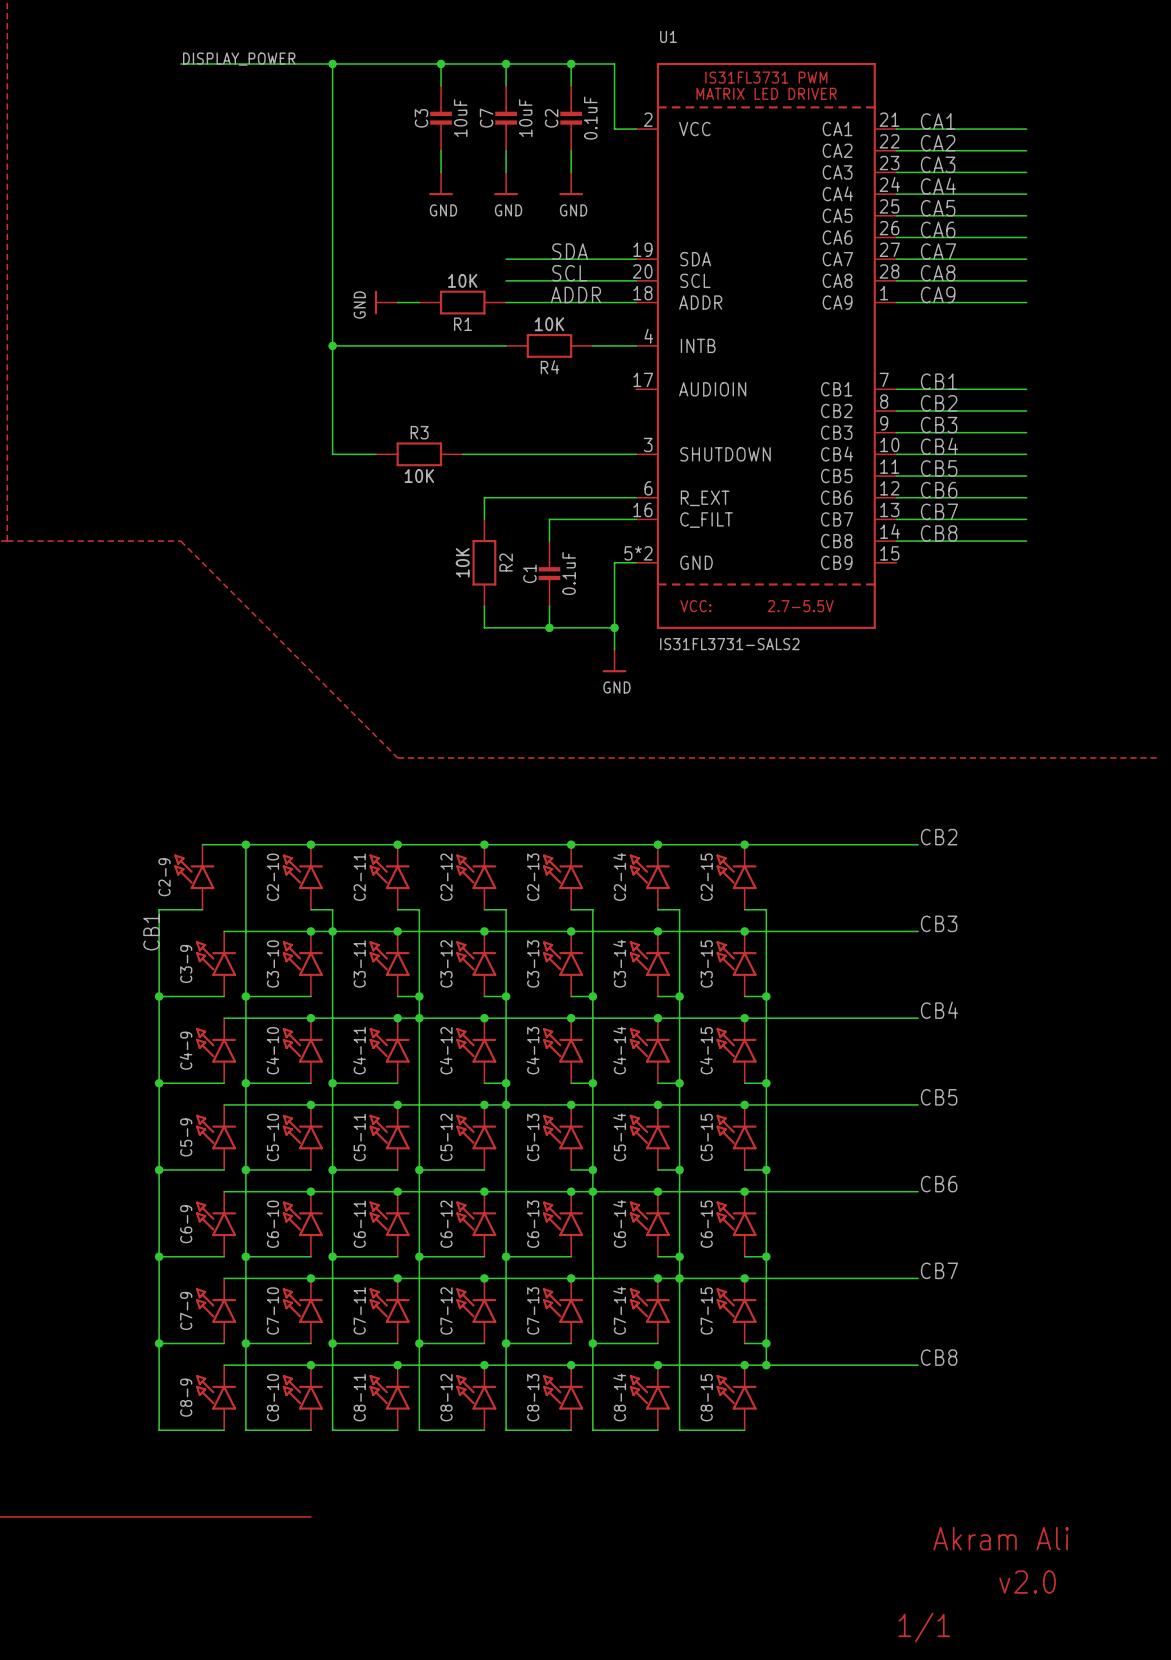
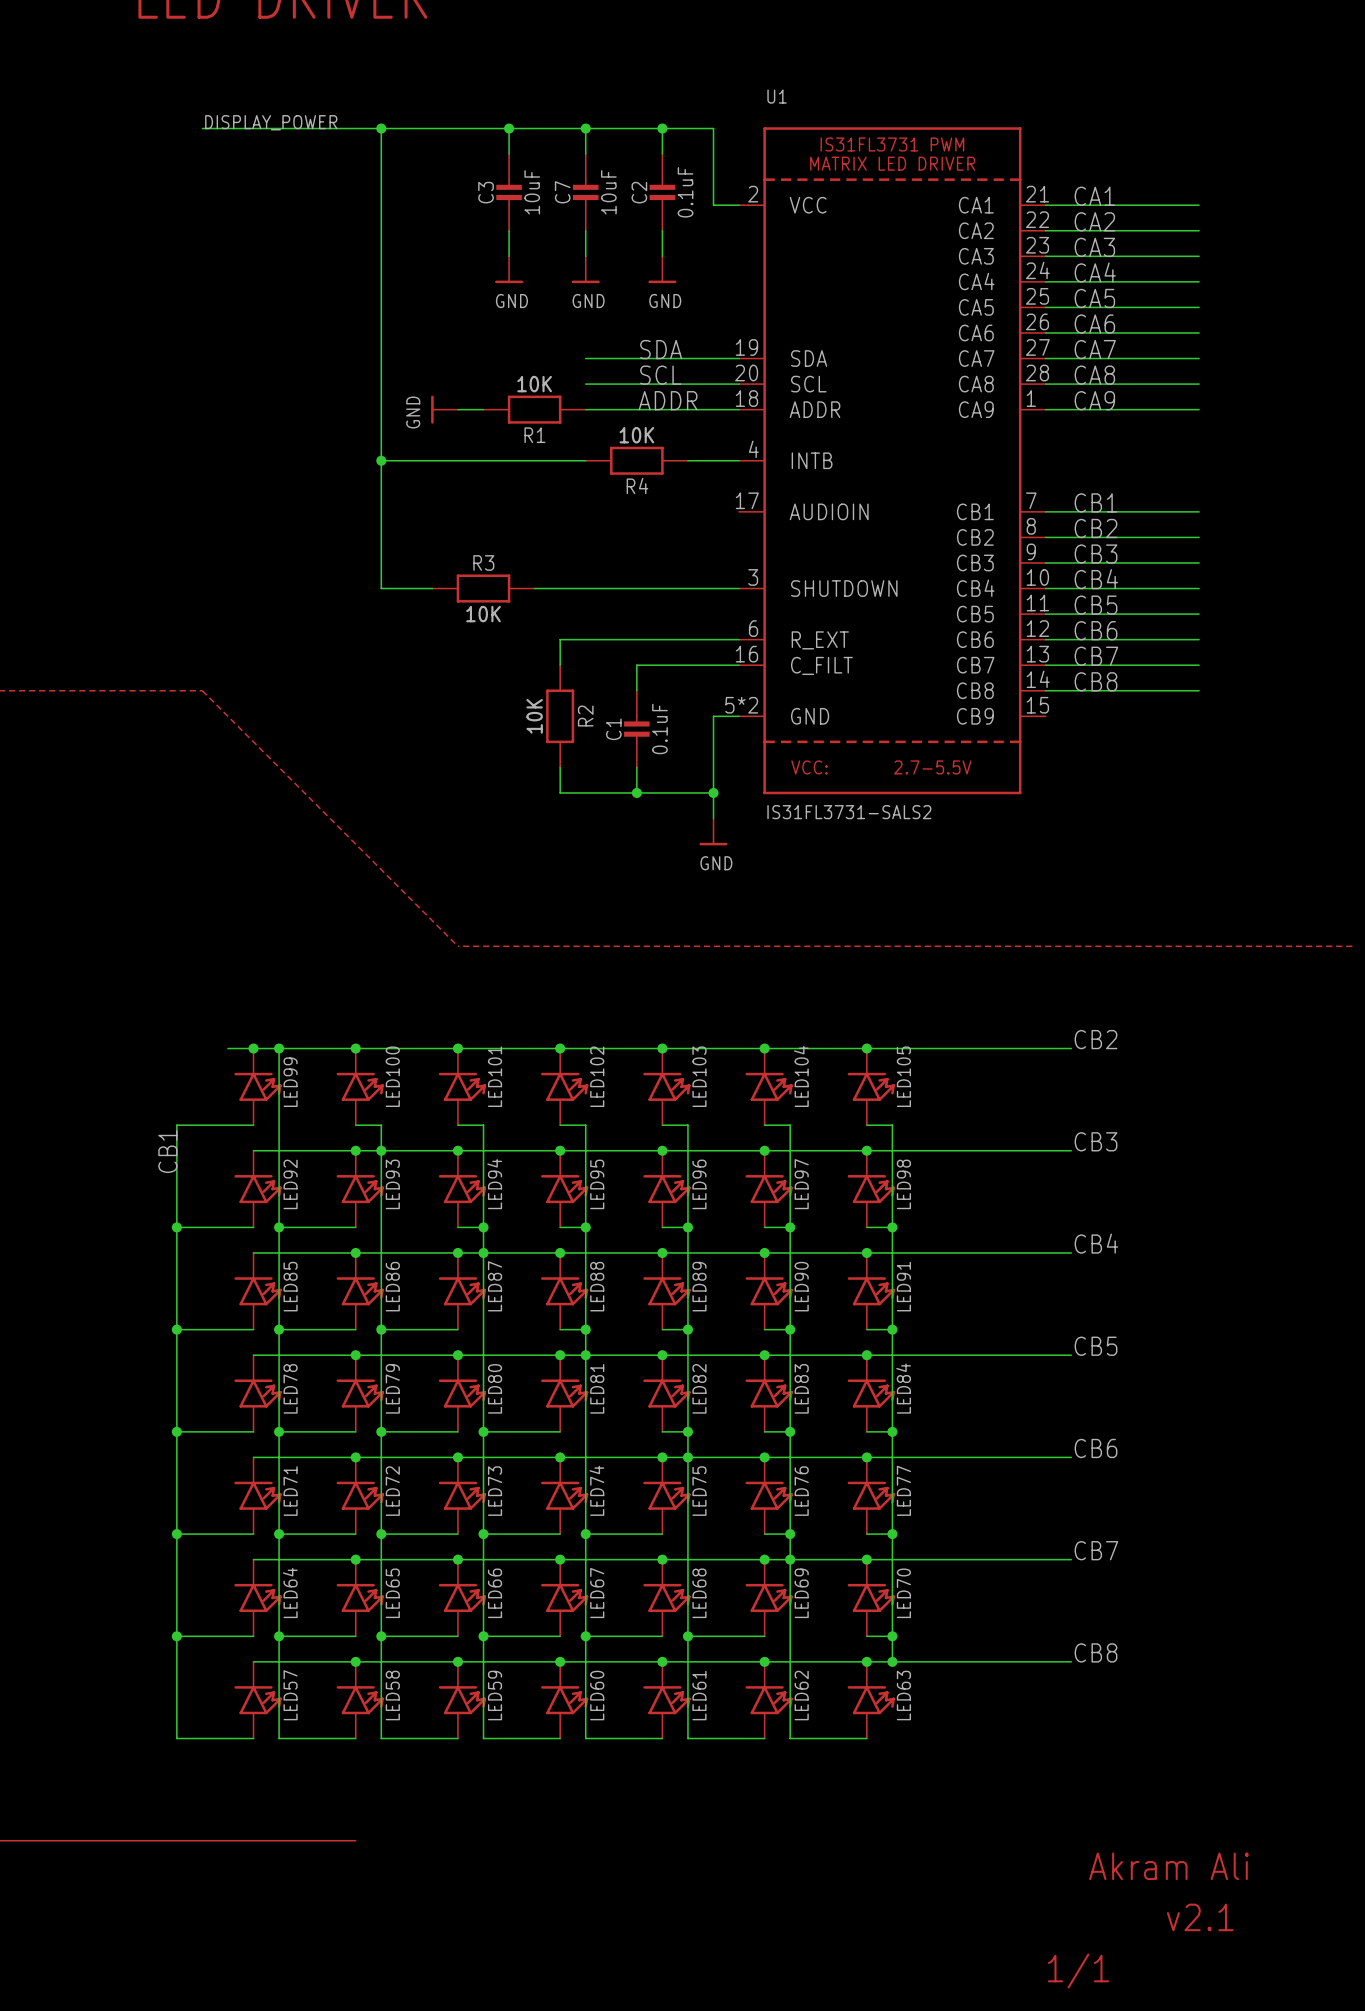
junction: none -> (253, 1048)
C2-9: (194, 877) -> none
LED99: none -> (257, 1086)
C2-10: (302, 877) -> none
LED100: none -> (360, 1086)
C2-11: (389, 877) -> none
LED101: none -> (462, 1086)
C2-12: (476, 877) -> none
LED102: none -> (564, 1086)
C2-13: (563, 877) -> none
LED103: none -> (666, 1086)
C2-14: (649, 877) -> none
LED104: none -> (769, 1086)
C2-15: (736, 877) -> none
LED105: none -> (871, 1086)
wire: none -> (227, 1125) (253, 1125)
C3-9: (216, 963) -> none
LED92: none -> (257, 1189)
C3-10: (302, 963) -> none
LED93: none -> (360, 1189)
C3-11: (389, 963) -> none
LED94: none -> (462, 1189)
C3-12: (476, 963) -> none
LED95: none -> (564, 1189)
C3-13: (563, 963) -> none
LED96: none -> (666, 1189)
C3-14: (649, 963) -> none
LED97: none -> (769, 1189)
C3-15: (736, 963) -> none
LED98: none -> (871, 1189)
C4-9: (216, 1050) -> none
LED85: none -> (257, 1291)
C4-10: (302, 1050) -> none
LED86: none -> (360, 1291)
C4-11: (389, 1050) -> none
LED87: none -> (462, 1291)
C4-12: (476, 1050) -> none
LED88: none -> (564, 1291)
C4-13: (563, 1050) -> none
LED89: none -> (666, 1291)
C4-14: (649, 1050) -> none
LED90: none -> (769, 1291)
C4-15: (736, 1050) -> none
LED91: none -> (871, 1291)
C5-9: (216, 1137) -> none
LED78: none -> (257, 1393)
C5-10: (302, 1137) -> none
LED79: none -> (360, 1393)
C5-11: (389, 1137) -> none
LED80: none -> (462, 1393)
C5-12: (476, 1137) -> none
LED81: none -> (564, 1393)
C5-13: (563, 1137) -> none
LED82: none -> (666, 1393)
C5-14: (649, 1137) -> none
LED83: none -> (769, 1393)
C5-15: (736, 1137) -> none
LED84: none -> (871, 1393)
C6-9: (216, 1224) -> none
LED71: none -> (257, 1495)
C6-10: (302, 1224) -> none
LED72: none -> (360, 1495)
C6-11: (389, 1224) -> none
LED73: none -> (462, 1495)
C6-12: (476, 1224) -> none
LED74: none -> (564, 1495)
C6-13: (563, 1224) -> none
LED75: none -> (666, 1495)
C6-14: (649, 1224) -> none
LED76: none -> (769, 1495)
C6-15: (736, 1224) -> none
LED77: none -> (871, 1495)
C7-9: (216, 1310) -> none
LED64: none -> (257, 1597)
C7-10: (302, 1310) -> none
LED65: none -> (360, 1597)
C7-11: (389, 1310) -> none
LED66: none -> (462, 1597)
C7-12: (476, 1310) -> none
LED67: none -> (564, 1597)
C7-13: (563, 1310) -> none
LED68: none -> (666, 1597)
C7-14: (649, 1310) -> none
LED69: none -> (769, 1597)
C7-15: (736, 1310) -> none
LED70: none -> (871, 1597)
C8-9: (216, 1397) -> none
LED57: none -> (257, 1700)
C8-10: (302, 1397) -> none
LED58: none -> (360, 1700)
C8-11: (389, 1397) -> none
LED59: none -> (462, 1700)
C8-12: (476, 1397) -> none
LED60: none -> (564, 1700)
C8-13: (563, 1397) -> none
LED61: none -> (666, 1700)
C8-14: (649, 1397) -> none
LED62: none -> (769, 1700)
C8-15: (736, 1397) -> none
LED63: none -> (871, 1700)
text: v2.0 (1027, 1582) -> v2.1 (1200, 1917)

